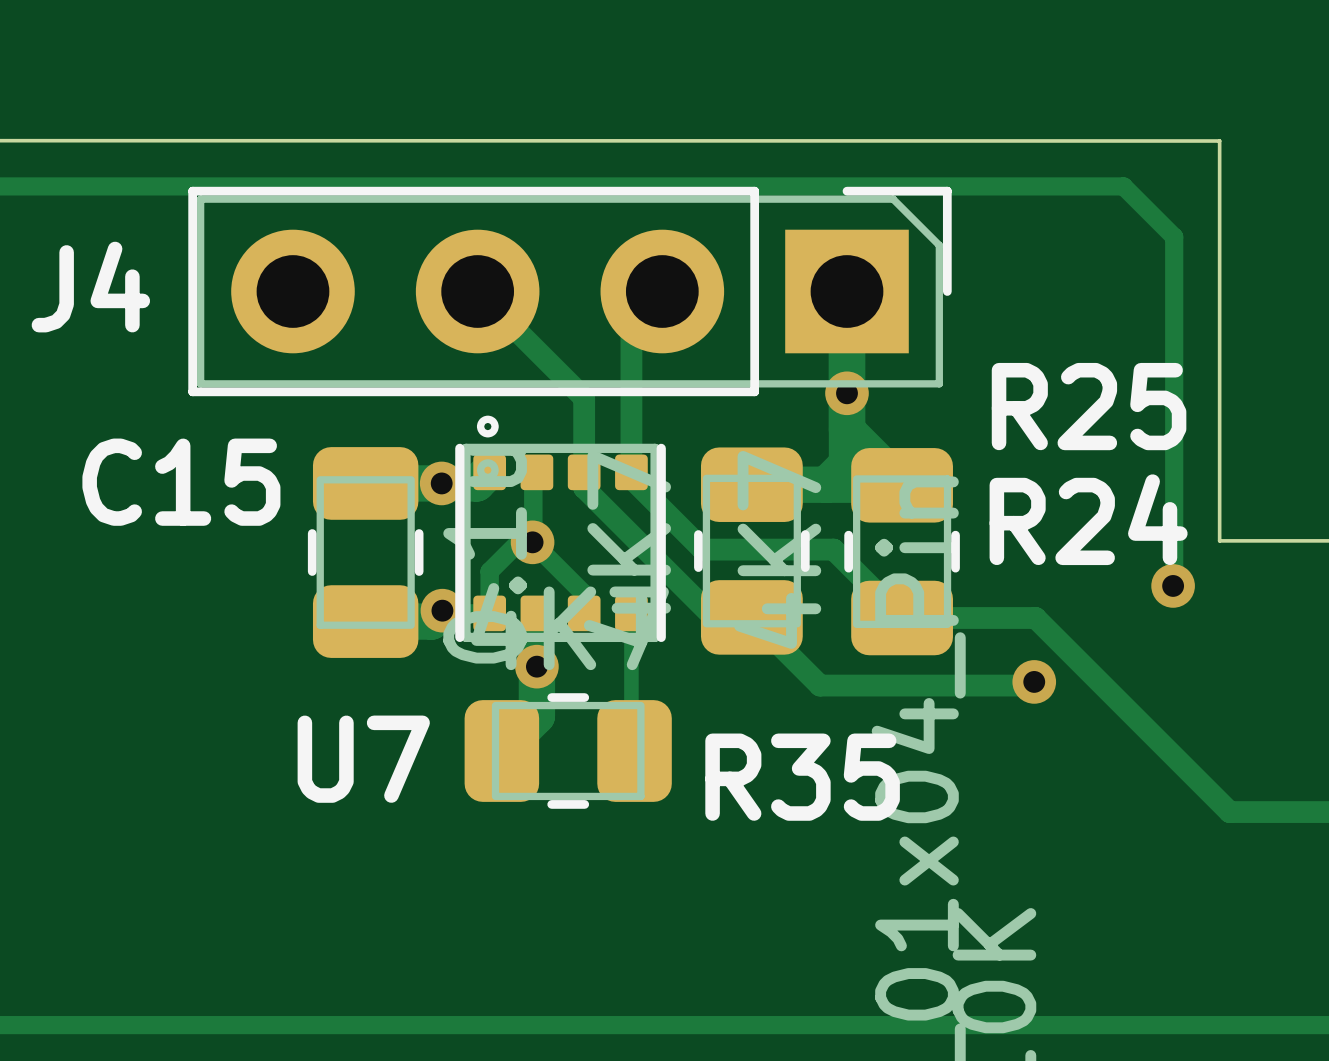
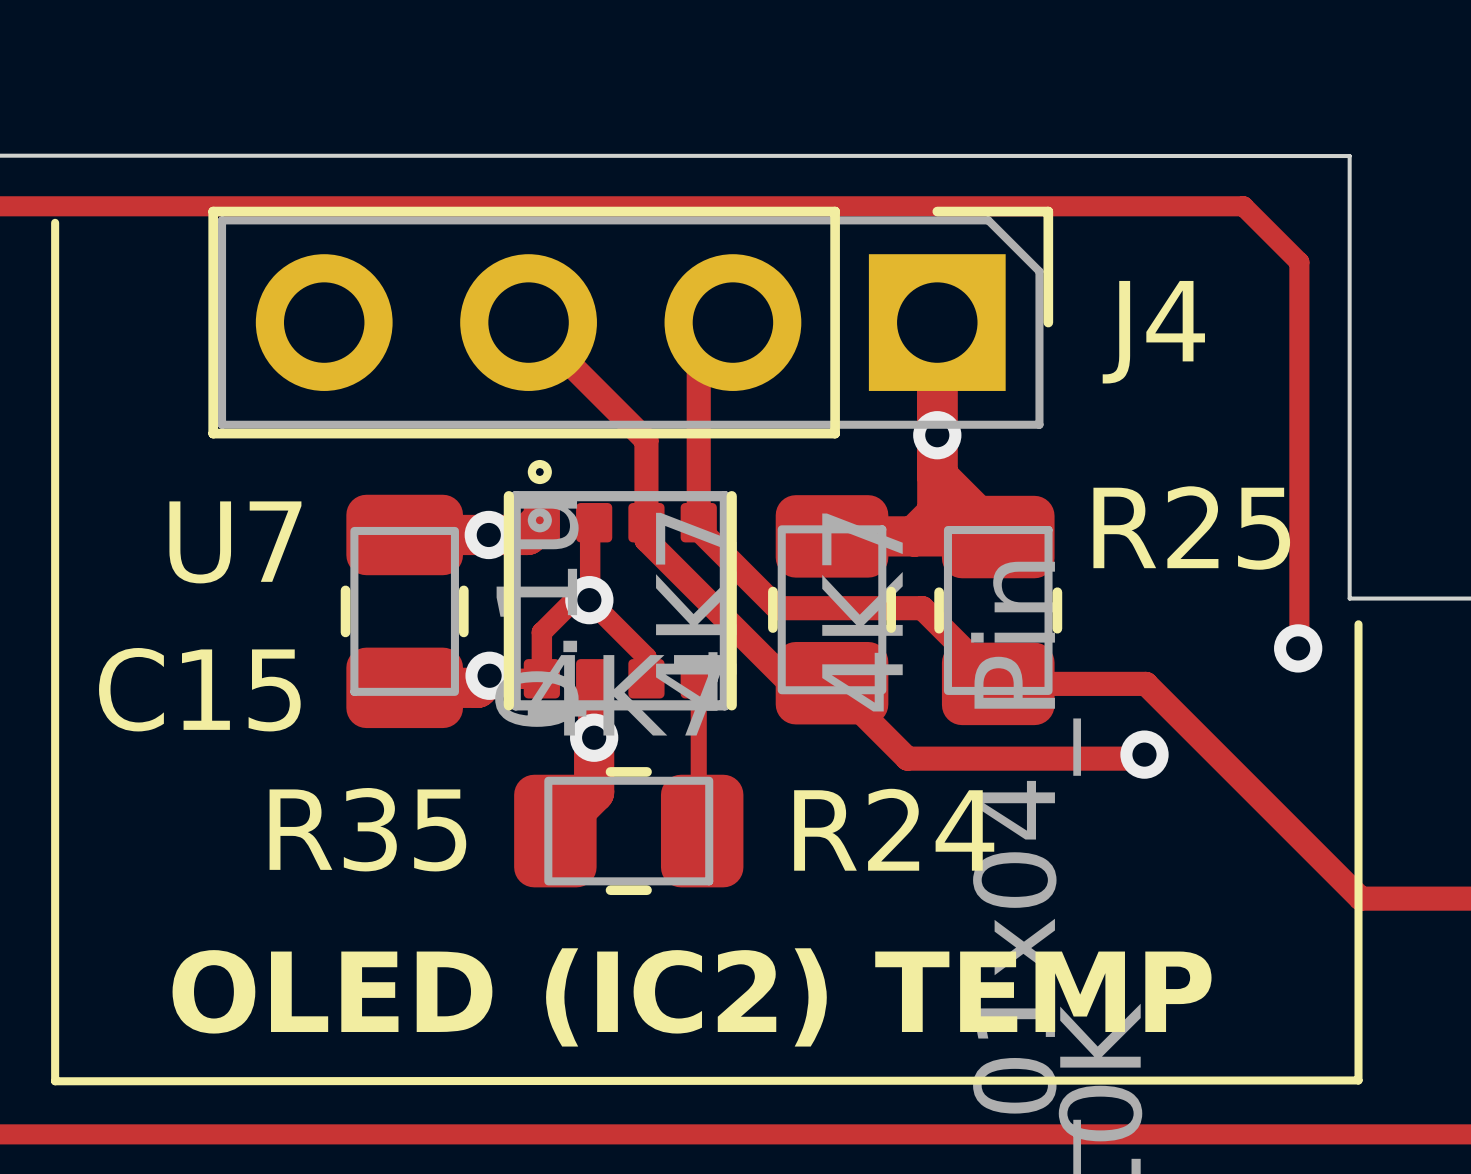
line: none -> (55, 222) (55, 1081) (1358, 1080) (1358, 624)
J4 name position: J4 (90, 287) -> J4 (1153, 332)
R25 name position: R25 (1089, 406) -> R25 (1191, 528)
C15 name position: C15 (181, 482) -> C15 (199, 689)
R24 name position: R24 (1088, 519) -> R24 (894, 829)
U7 name position: U7 (363, 759) -> U7 (235, 542)
R35 name position: R35 (802, 777) -> R35 (367, 829)
text: none -> OLED (IC2) TEMP (692, 997)

